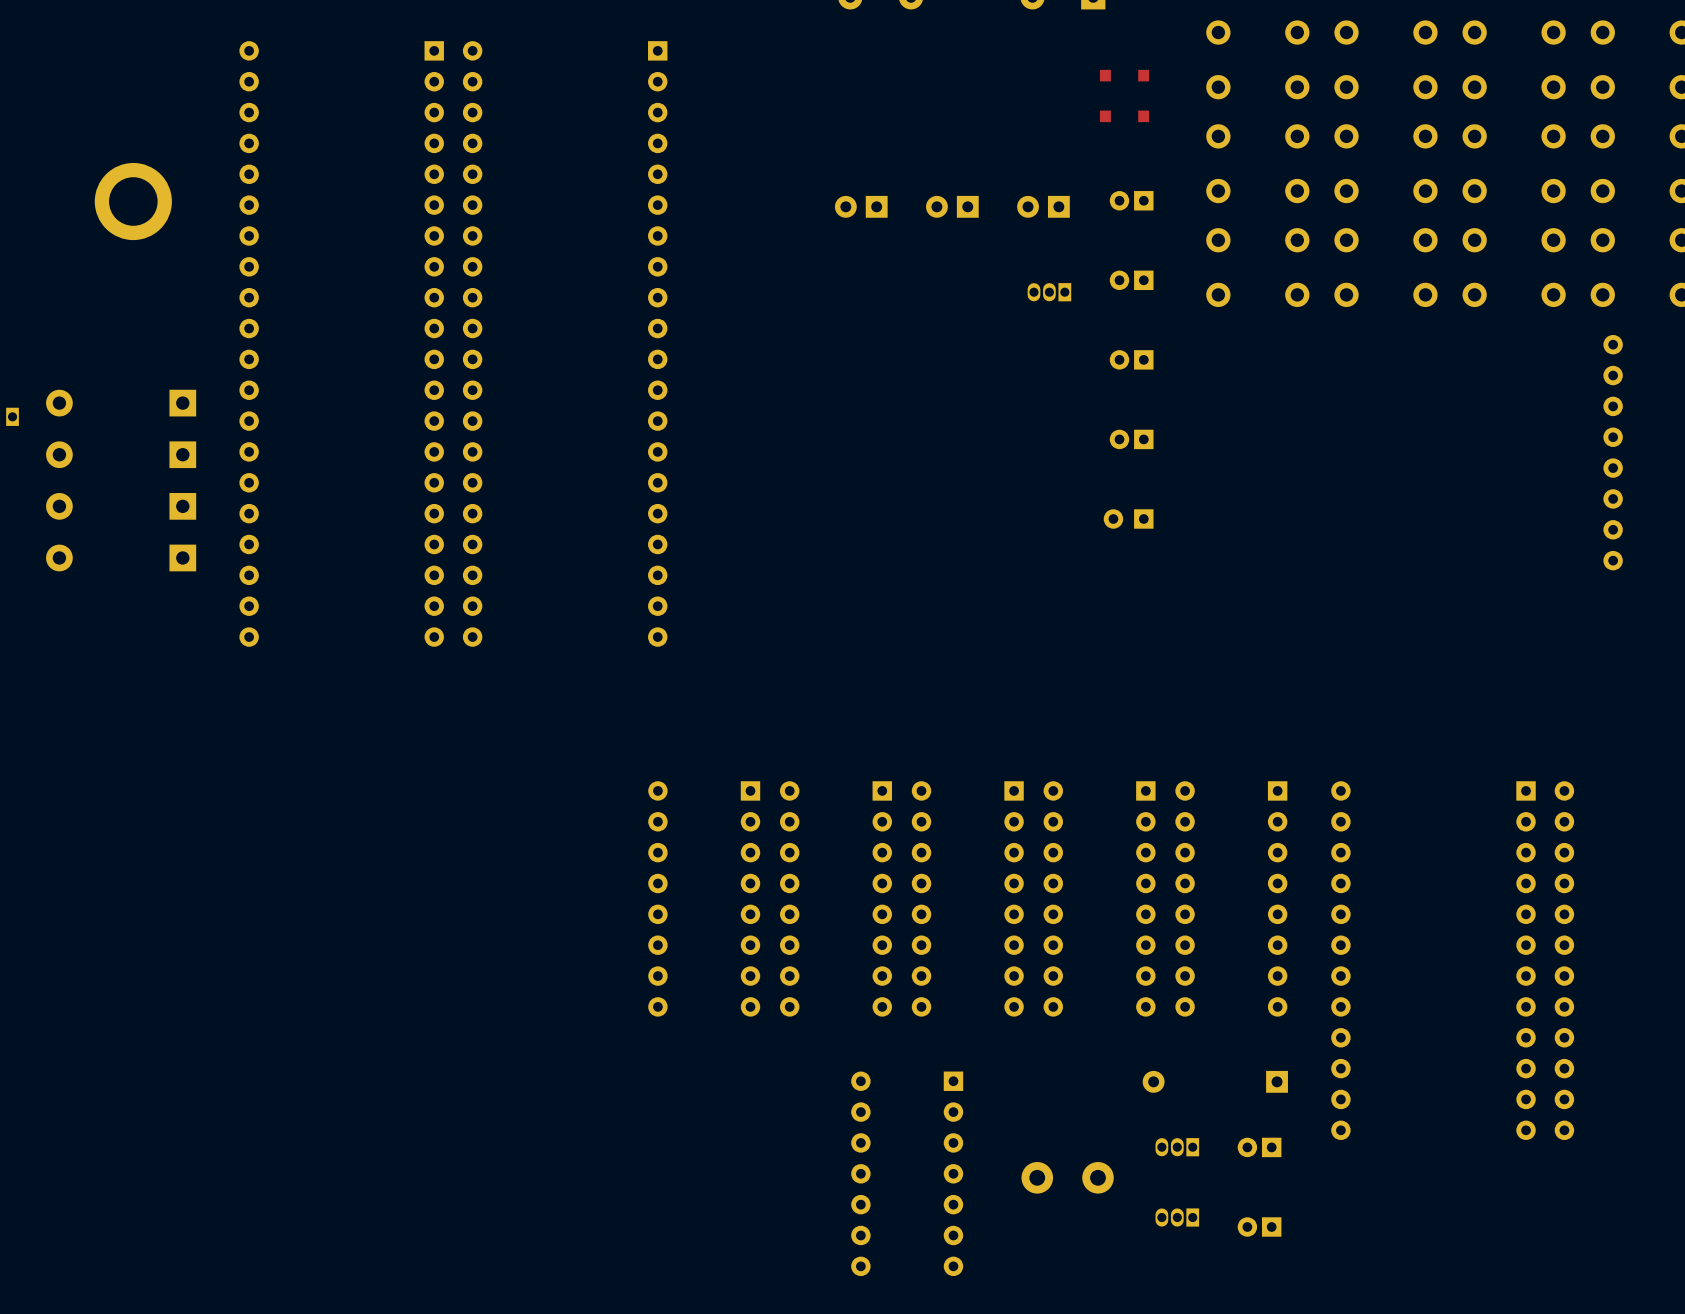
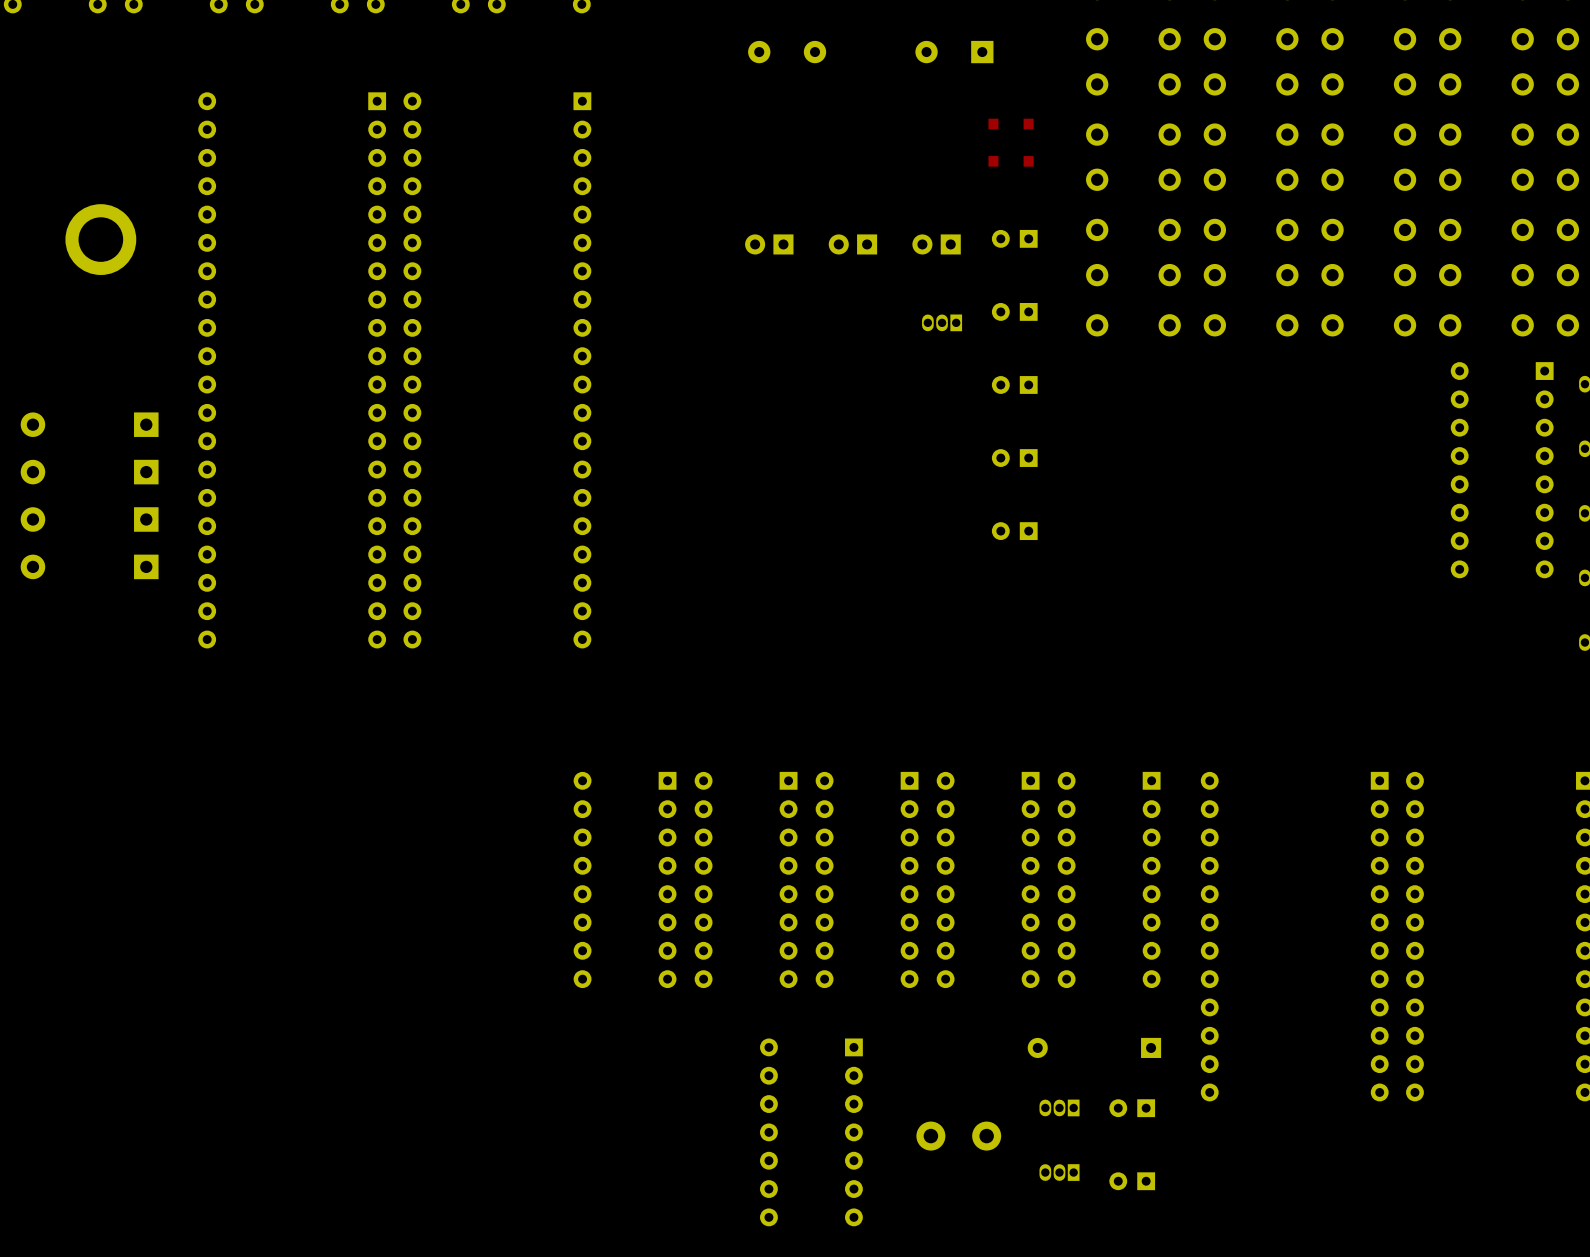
part footprint: [1109, 191, 1154, 211] -> [991, 229, 1038, 248]
part footprint: [1109, 270, 1154, 291] -> [991, 303, 1038, 321]
part footprint: [1109, 350, 1154, 370] -> [991, 376, 1038, 394]
part footprint: [1109, 429, 1154, 450] -> [991, 449, 1038, 467]
part footprint: [1237, 1137, 1282, 1158] -> [1109, 1099, 1156, 1118]
part footprint: [1237, 1217, 1282, 1237] -> [1109, 1172, 1156, 1191]

